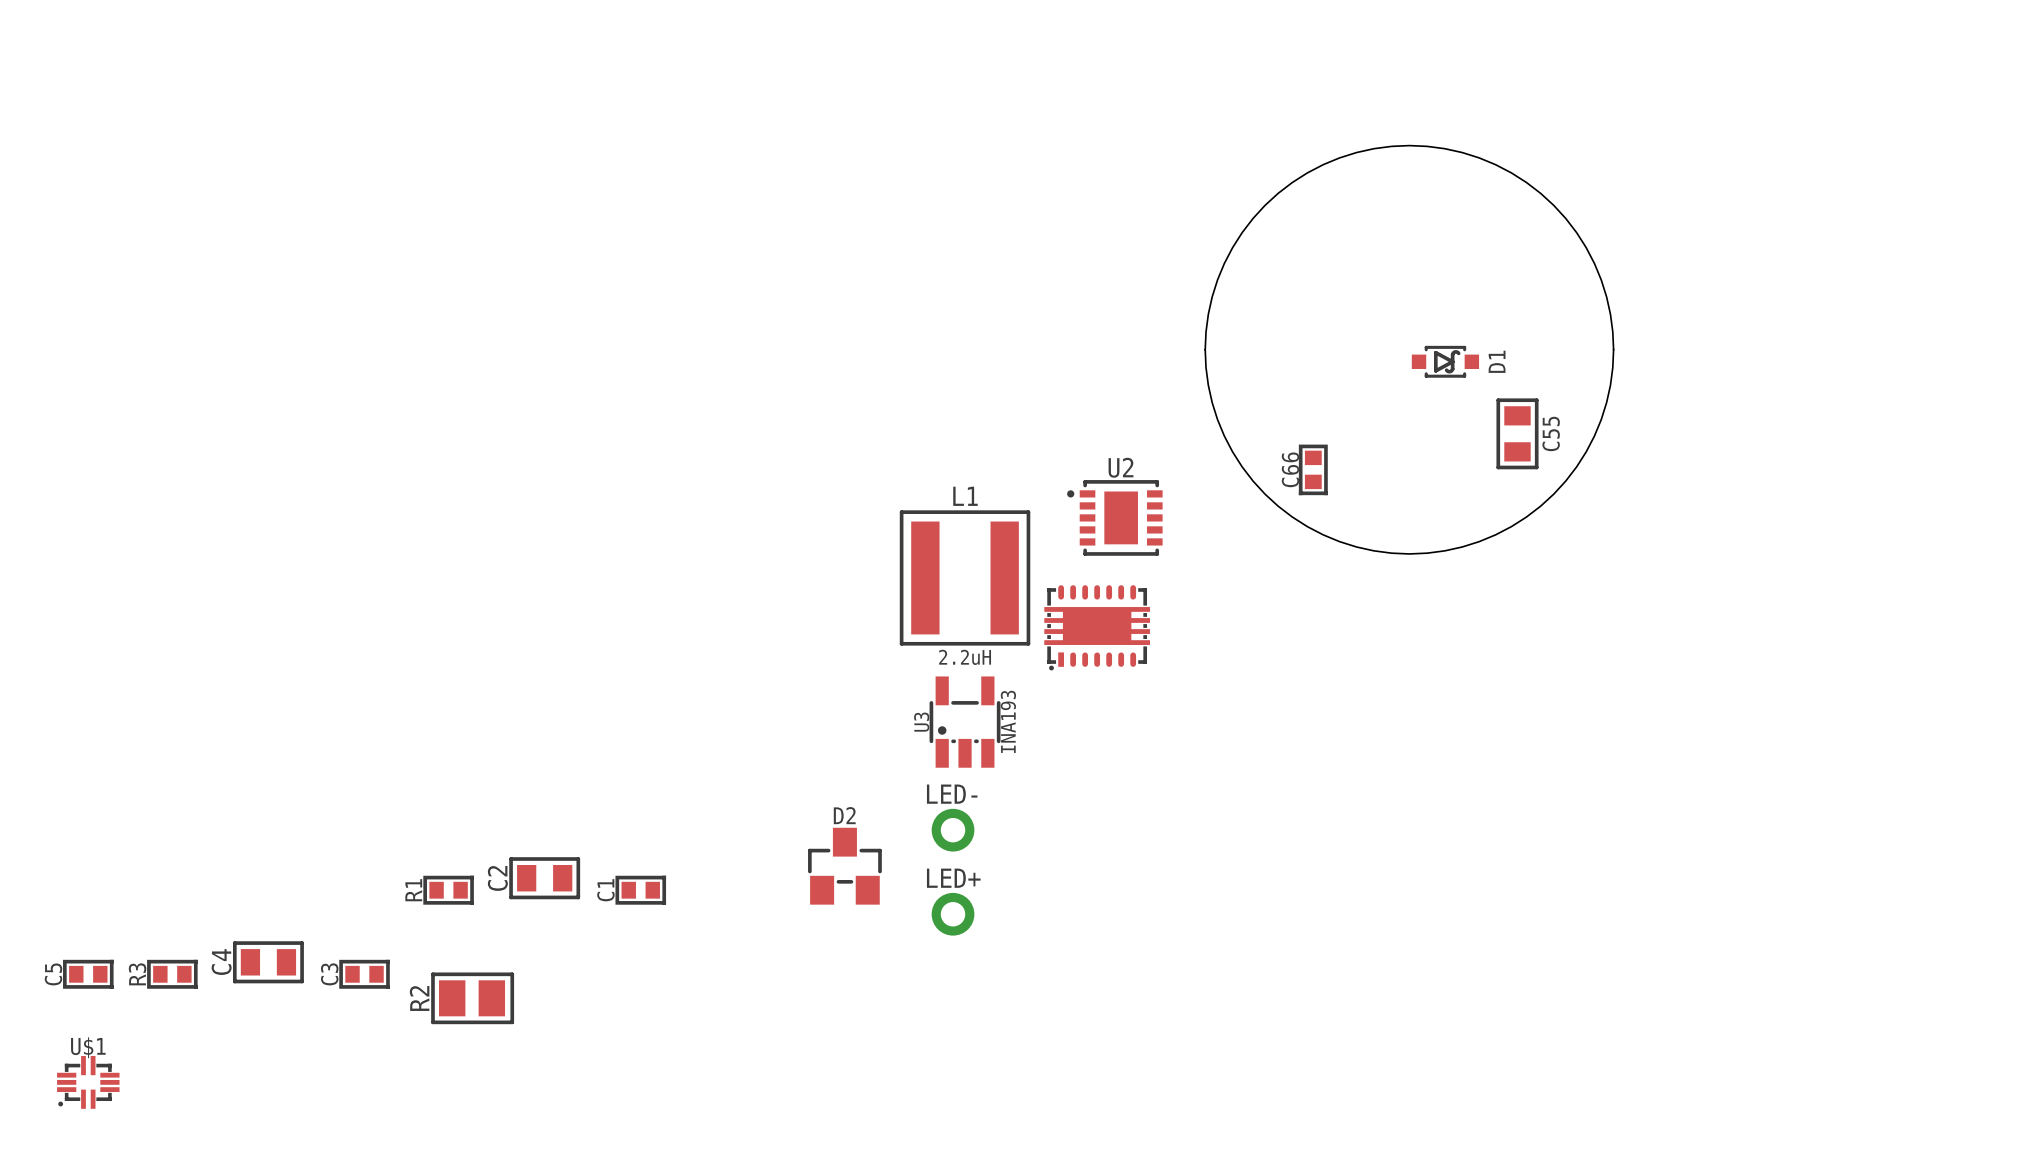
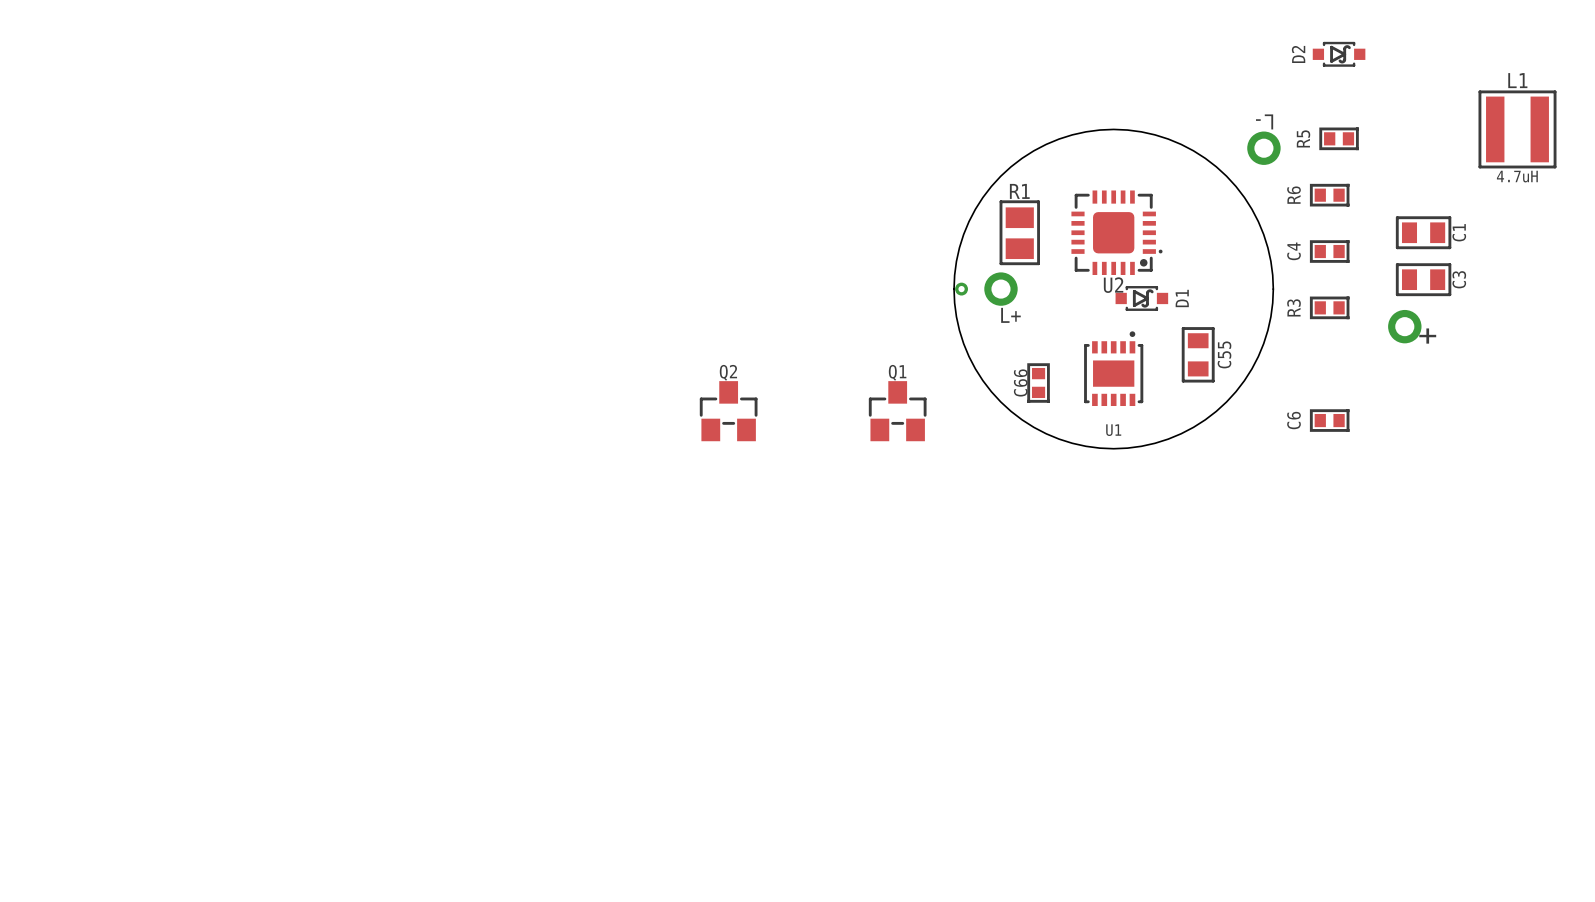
R5: none -> (1339, 138)
L-: none -> (1263, 148)
R6: none -> (1329, 195)
part: none -> (961, 289)
L+: none -> (1000, 289)
part: none -> (1404, 326)
U1: none -> (1113, 368)
U2 name position: U2 (1121, 467) -> U2 (1113, 285)
U2 footprint: [1067, 480, 1163, 556] -> [1071, 190, 1163, 276]
Q2: none -> (728, 411)
Q1: none -> (897, 411)
L1 footprint: [899, 510, 1031, 646] -> [1478, 90, 1557, 169]
C6: none -> (1329, 420)
part: (1097, 627) -> none
L1 value: 2.2uH (965, 657) -> 4.7uH (1517, 176)
U3: INA193 (965, 722) -> none
D2 name position: D2 (844, 815) -> D2 (1298, 54)
D2 footprint: [808, 827, 882, 905] -> [1312, 41, 1366, 67]
LED-: (953, 830) -> none
R1 footprint: [423, 875, 474, 905] -> [999, 200, 1040, 266]
C1 footprint: [615, 875, 667, 905] -> [1395, 216, 1452, 250]
C2: (544, 878) -> none
R1 name position: R1 (413, 890) -> R1 (1019, 191)
C1 name position: C1 (605, 890) -> C1 (1459, 232)
LED+: (953, 914) -> none
C4 footprint: [232, 941, 304, 984] -> [1309, 240, 1350, 263]
C3 footprint: [339, 959, 390, 989] -> [1395, 263, 1452, 297]
C5: (88, 974) -> none
R3 name position: R3 (137, 974) -> R3 (1294, 307)
R3 position: (172, 974) -> (1329, 307)
C3 name position: C3 (329, 974) -> C3 (1459, 279)
R2: (472, 998) -> none
U$1: (88, 1082) -> none

